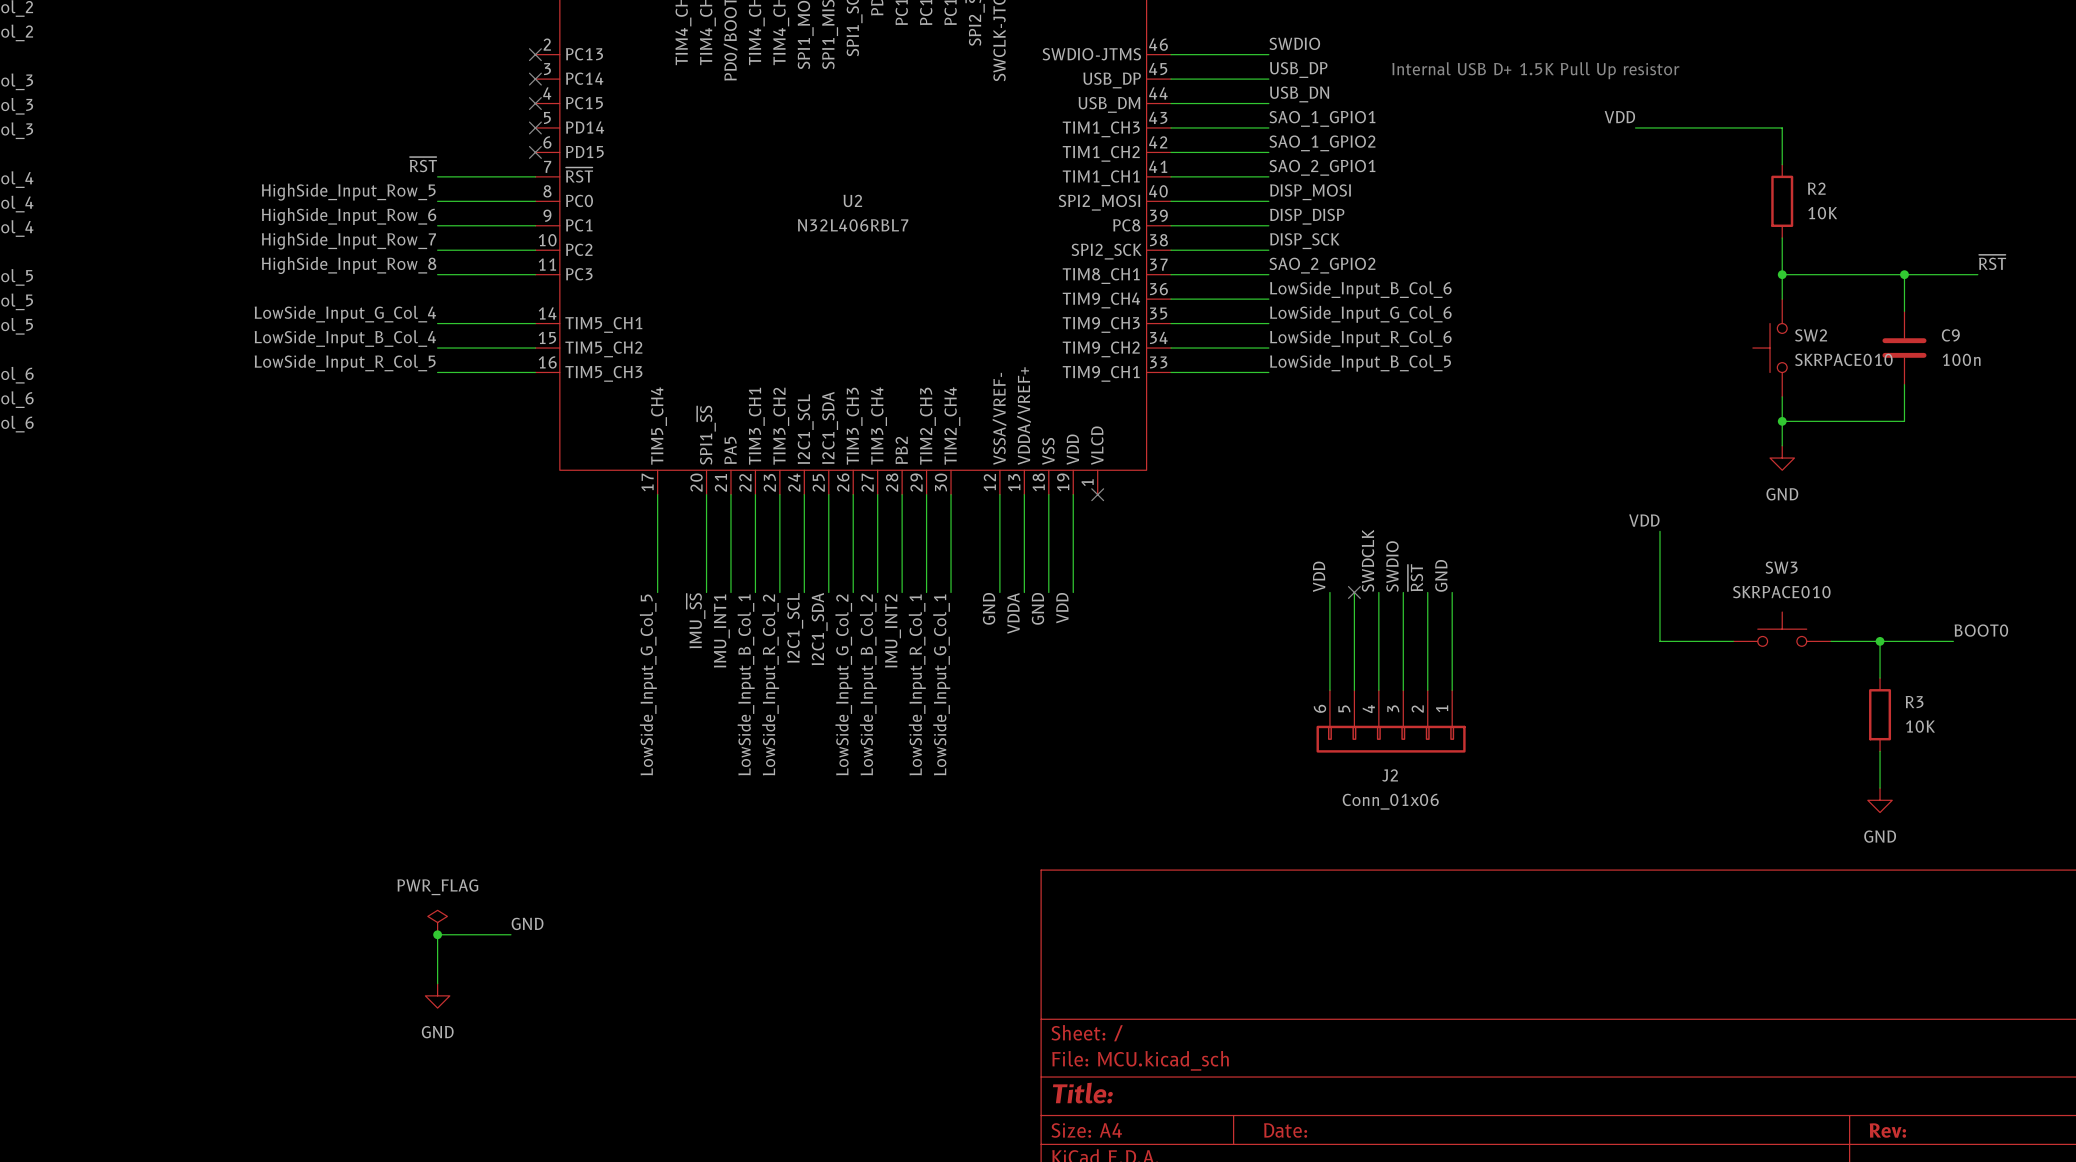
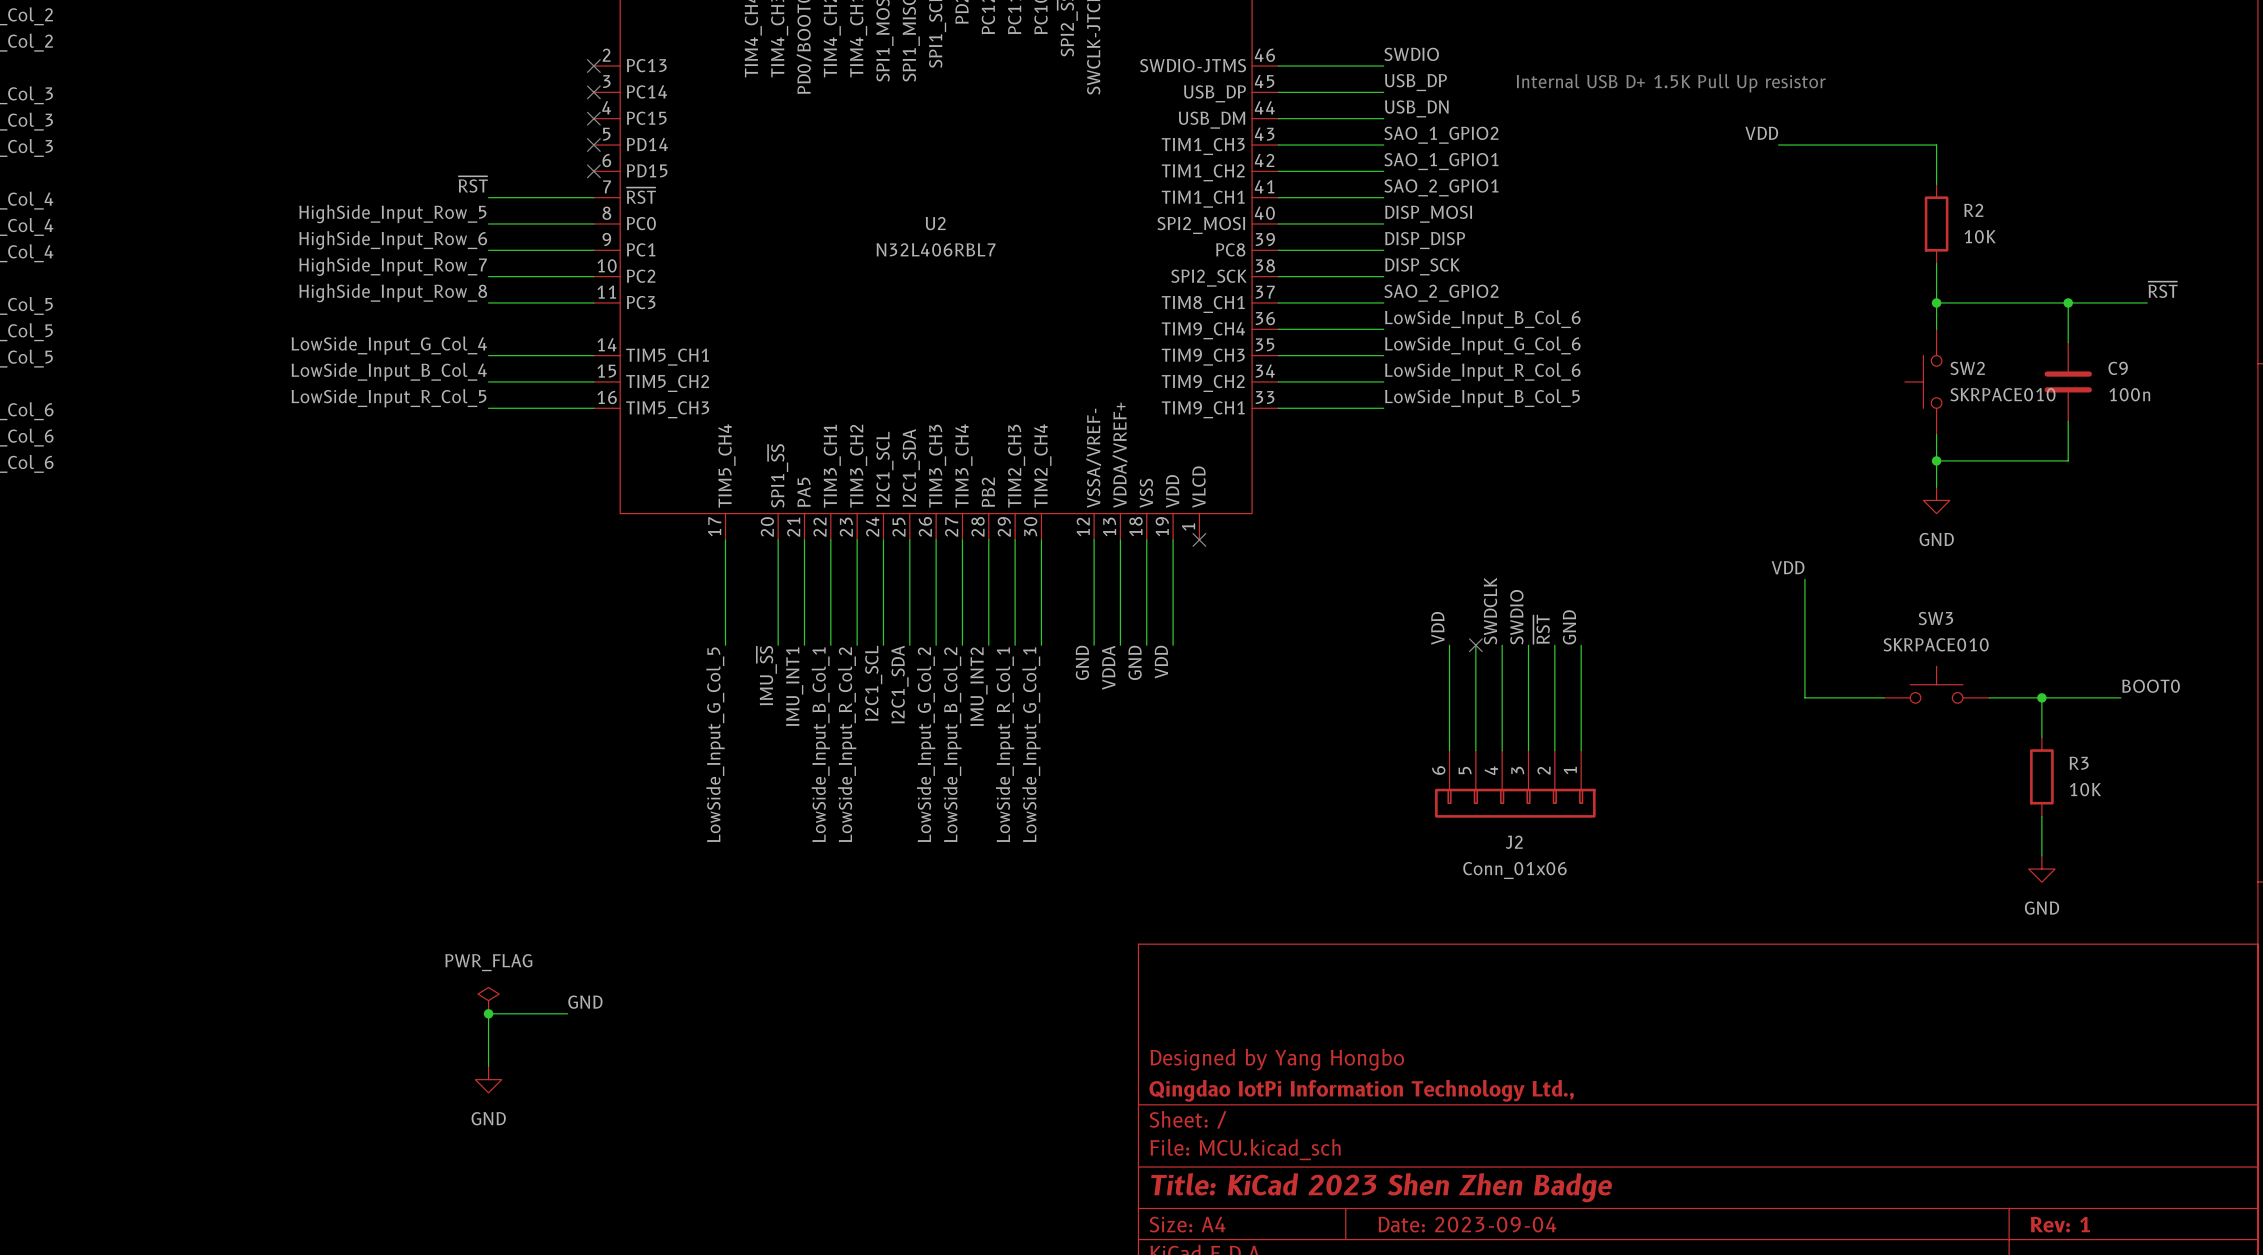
label: SAO_1_GPIO1 (1322, 118) -> SAO_1_GPIO2 (1441, 135)
label: SAO_1_GPIO2 (1322, 143) -> SAO_1_GPIO1 (1441, 161)
title block: none -> Designed by Yang Hongbo (1277, 1059)
title block: none -> Qingdao IotPi Information Technology Ltd., (1361, 1090)
title block: Title: (1082, 1093) -> Title: KiCad 2023 Shen Zhen Badge (1381, 1187)
title block: Date: (1285, 1130) -> Date: 2023-09-04 (1467, 1224)
title block: Rev: (1887, 1130) -> Rev: 1 (2060, 1224)

